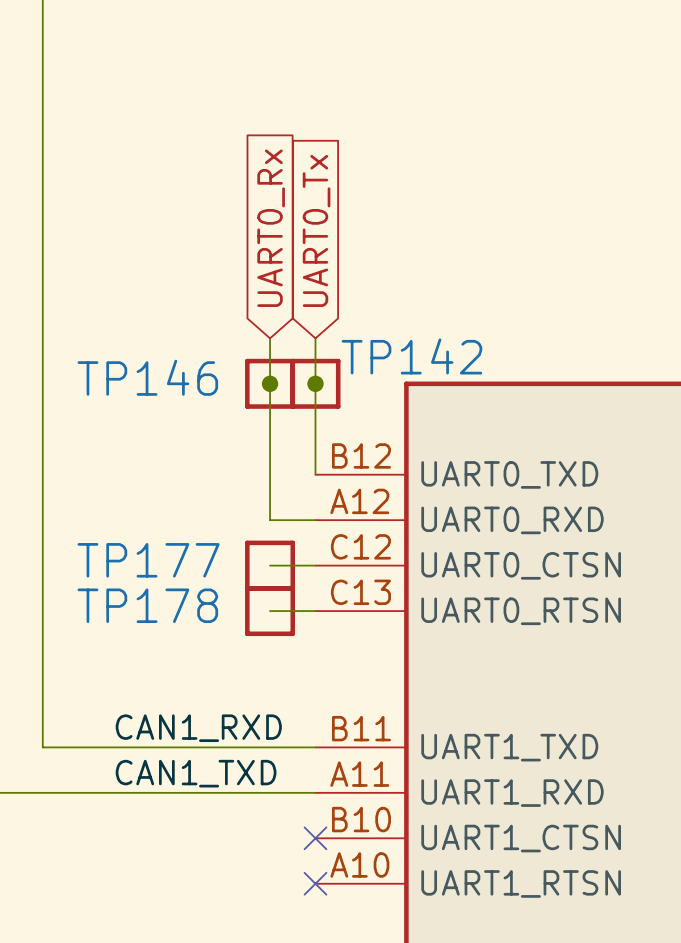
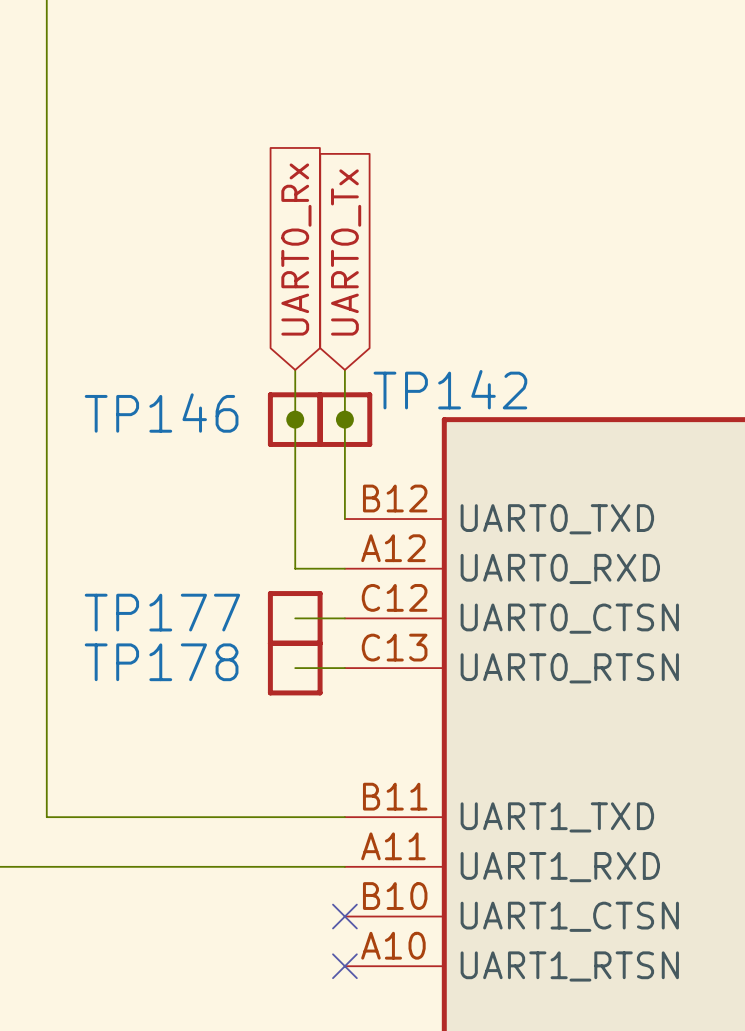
label: CAN1_RXD (198, 728) -> none
label: CAN1_TXD (196, 773) -> none

